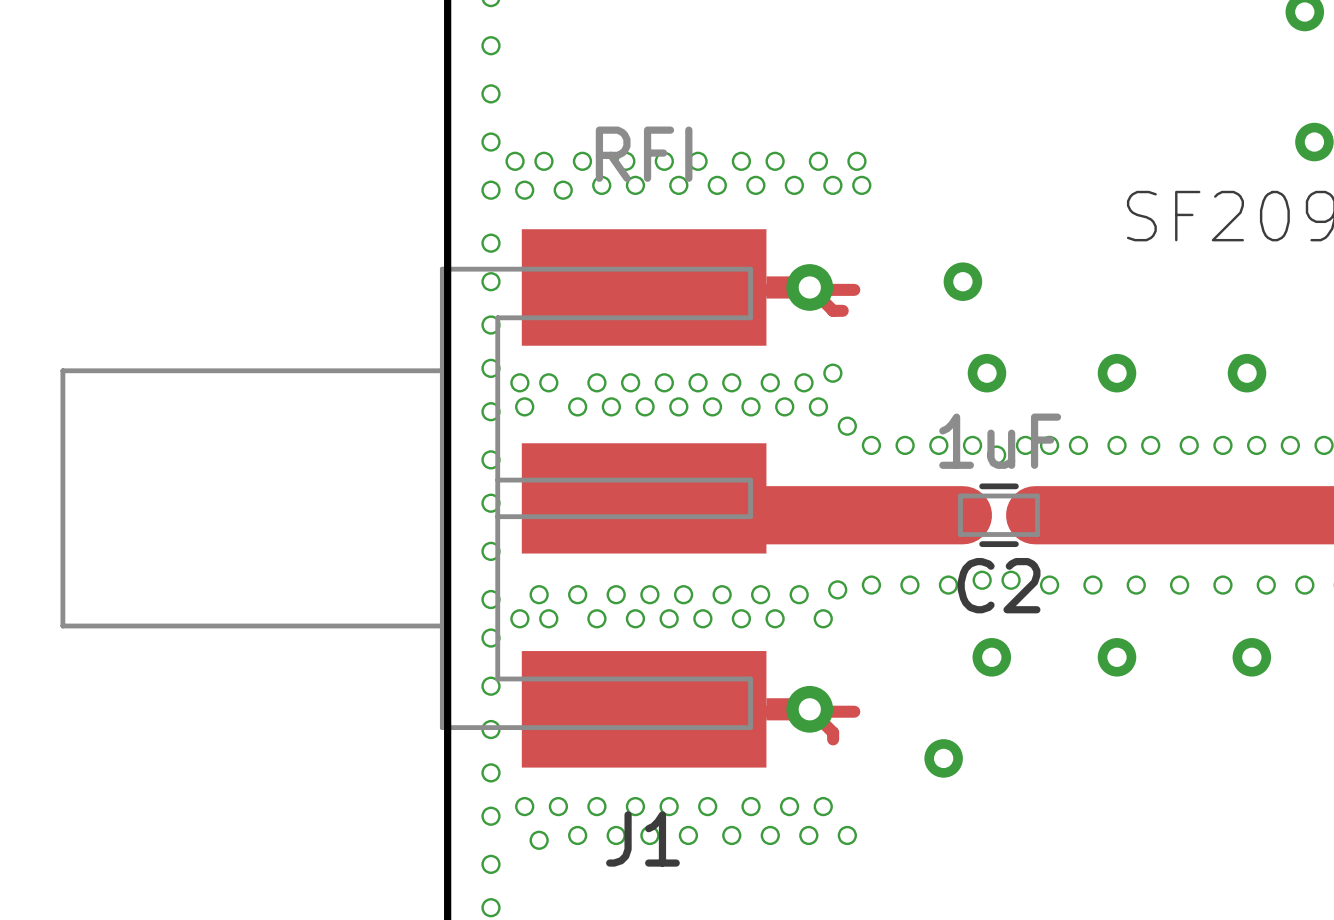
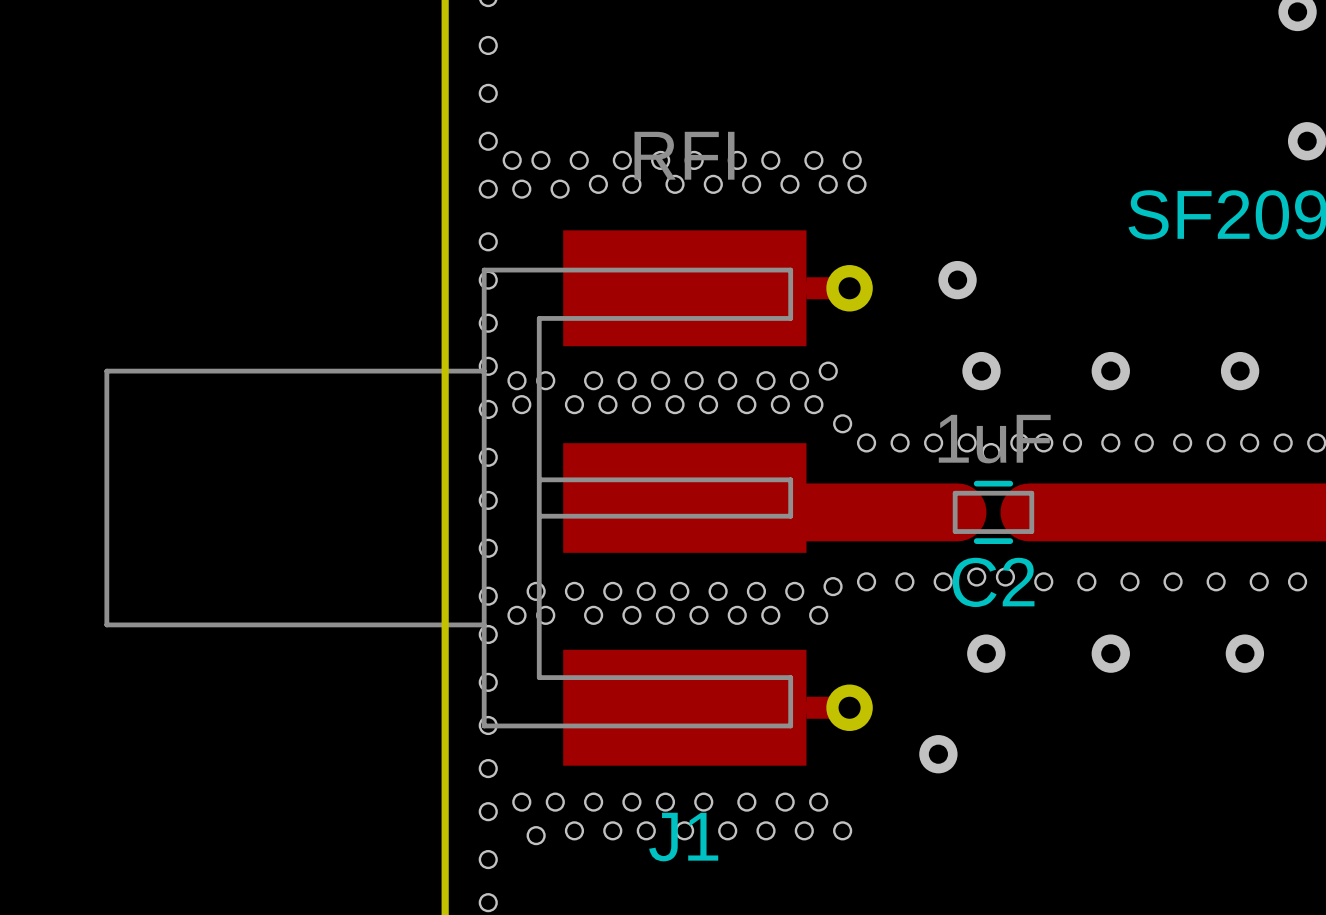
track: (809, 287) (833, 310) (842, 310) -> none
J1 position: (446, 498) -> (488, 498)
track: (809, 709) (833, 732) (833, 739) -> none

